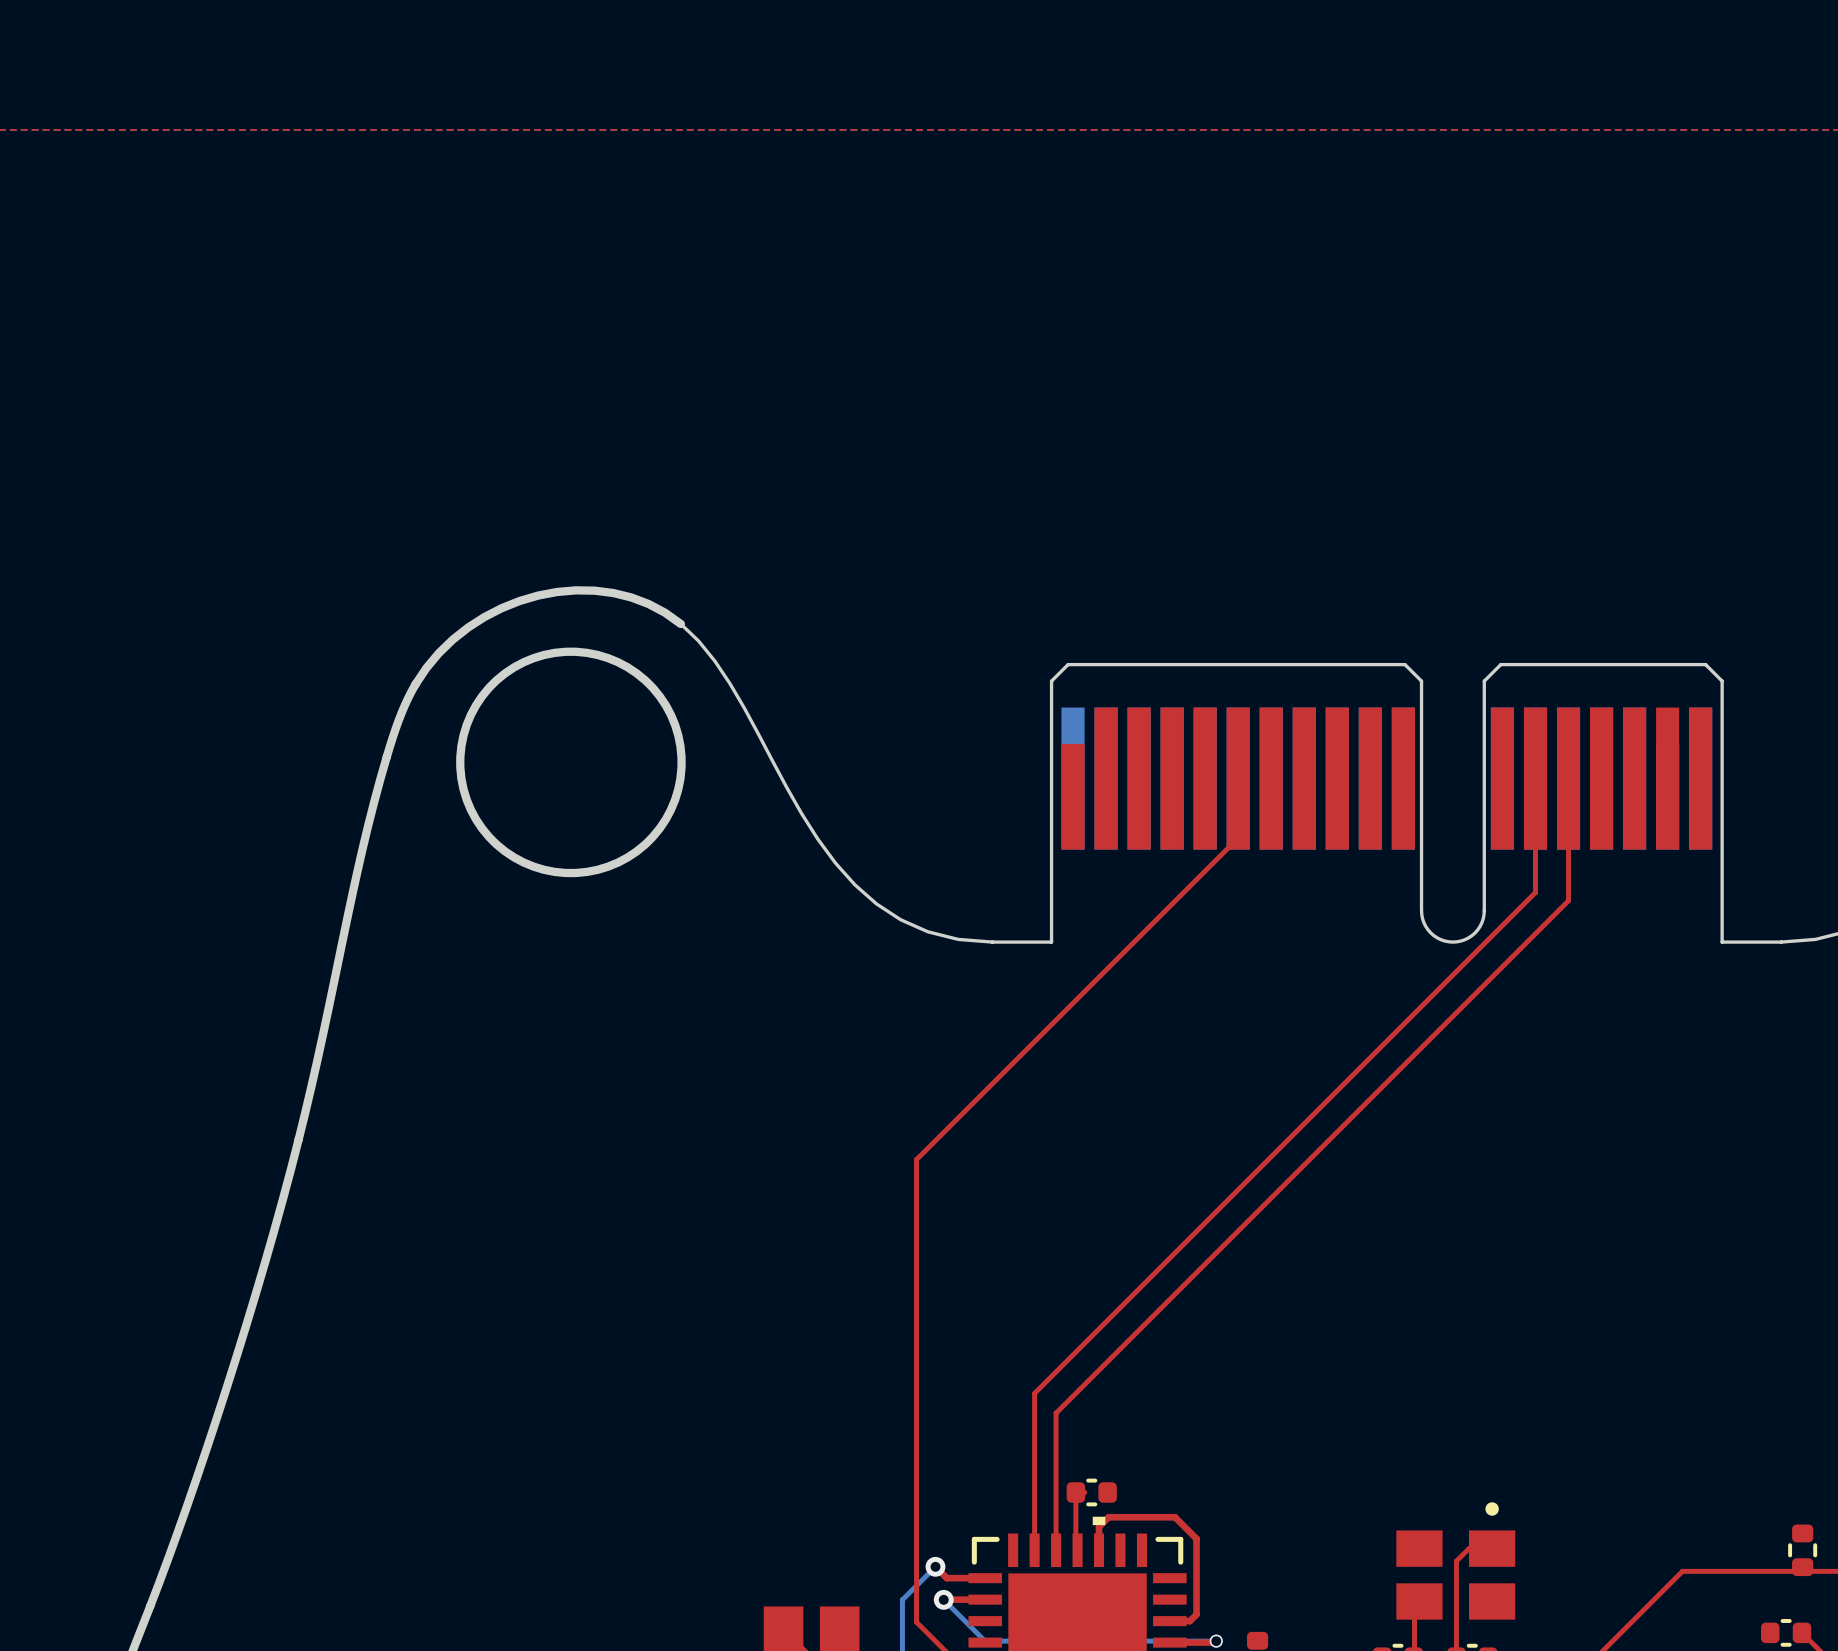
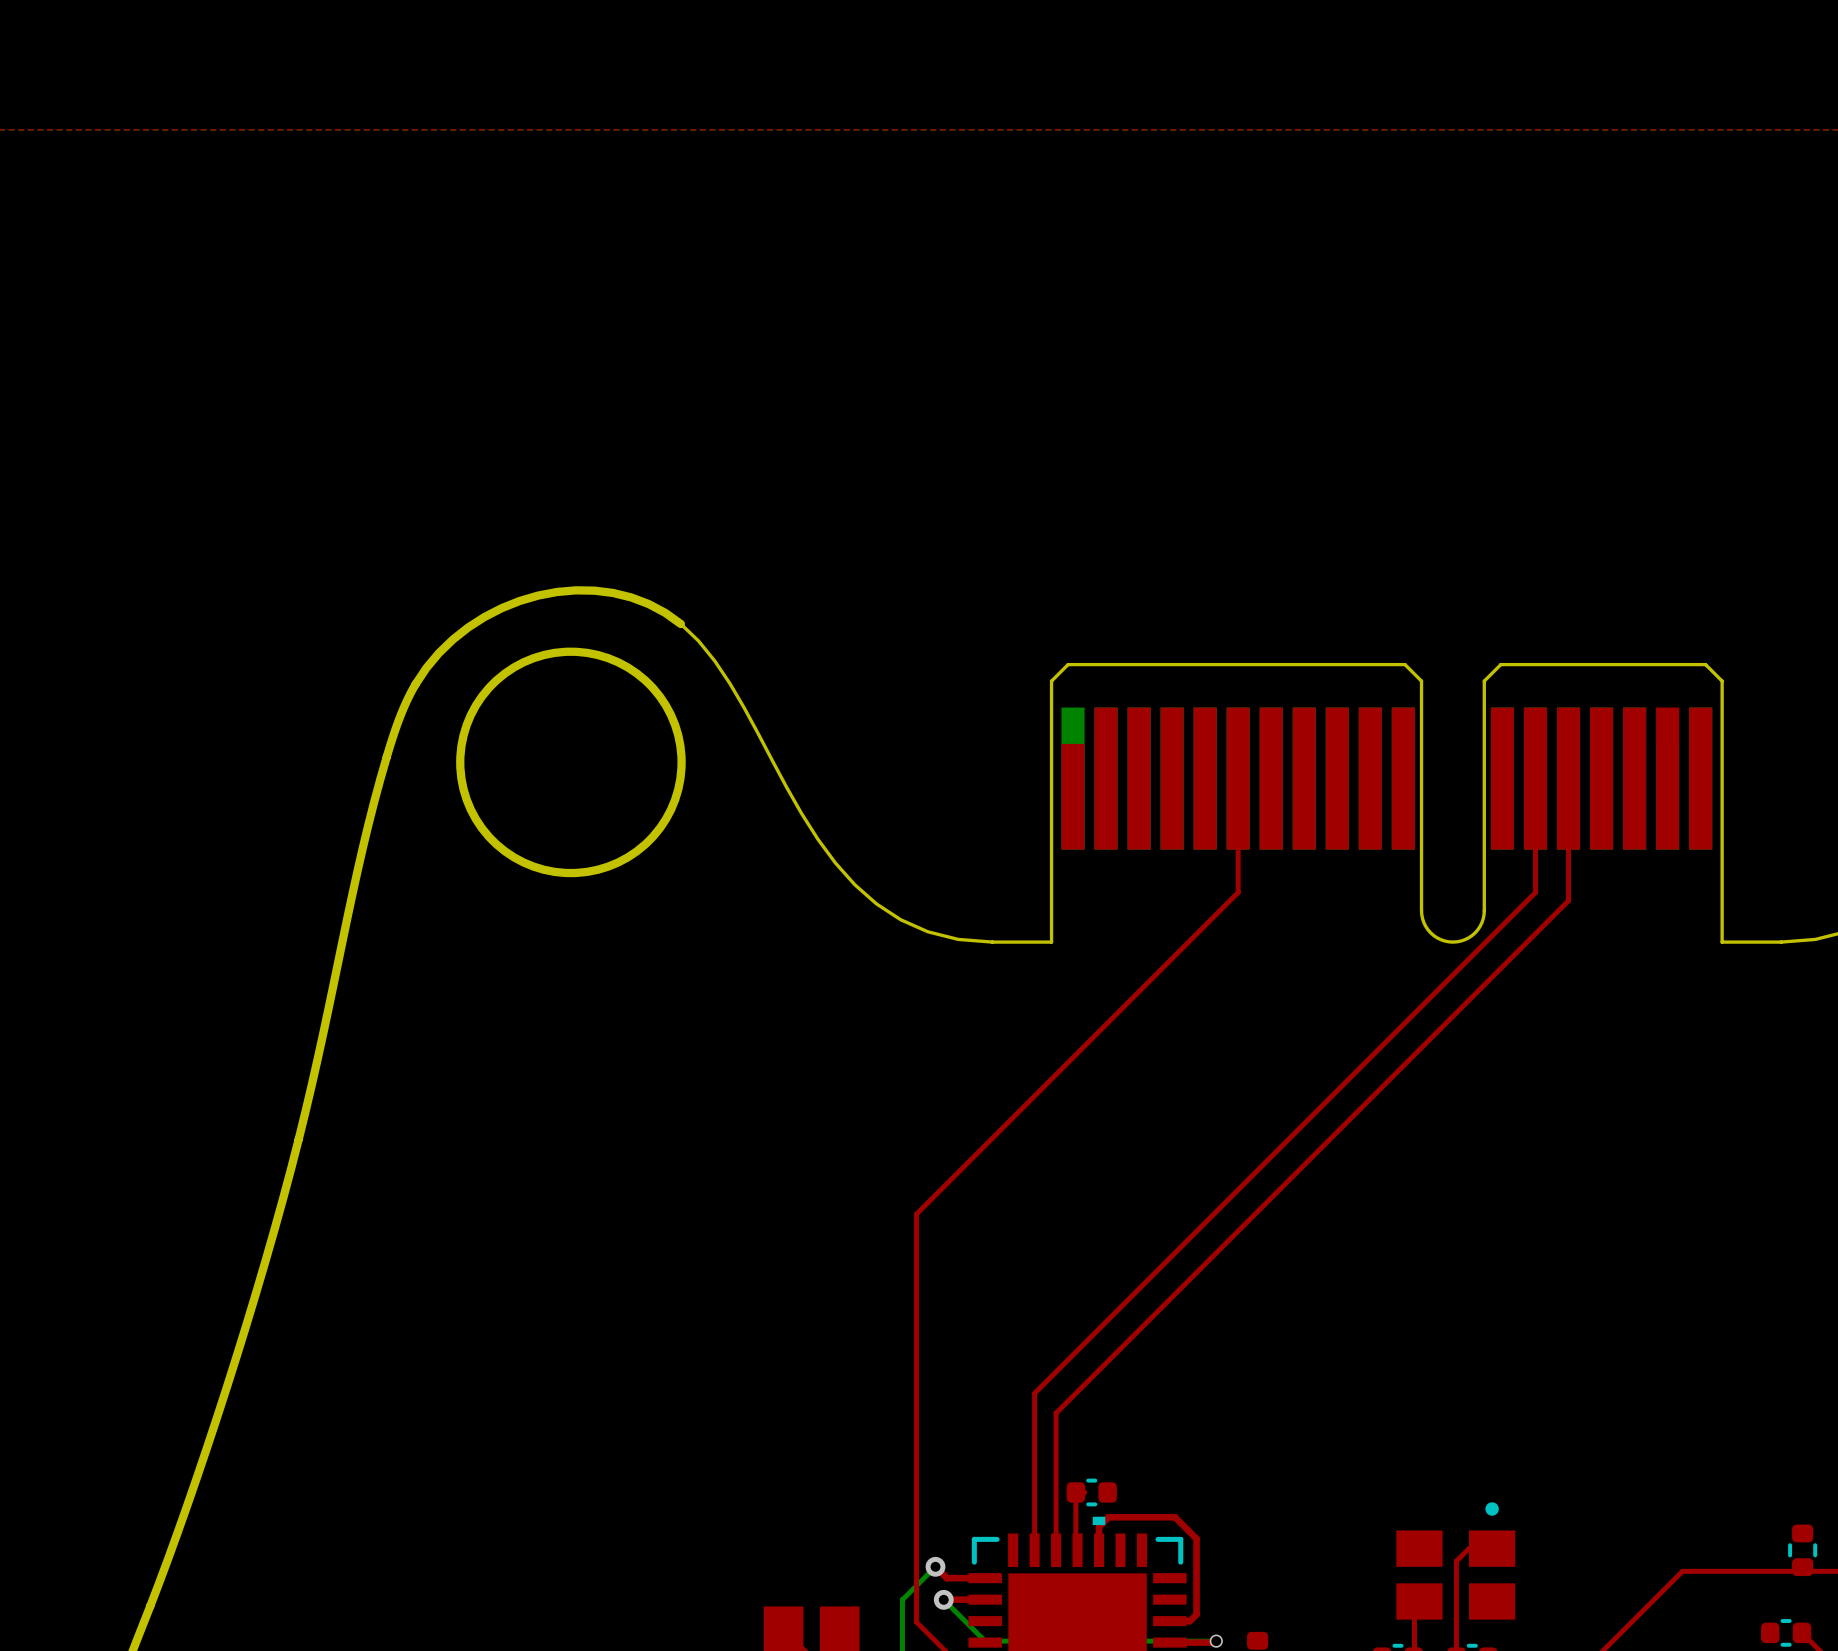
top track: (1238, 838) (916, 1159) (916, 1214) -> (1238, 838) (1238, 892) (916, 1214)

